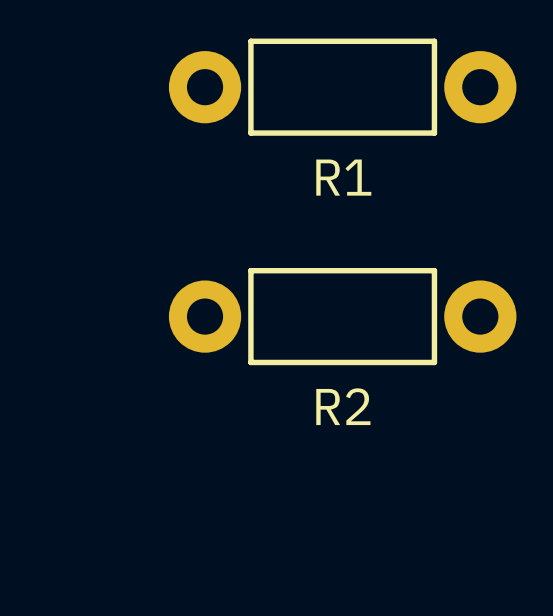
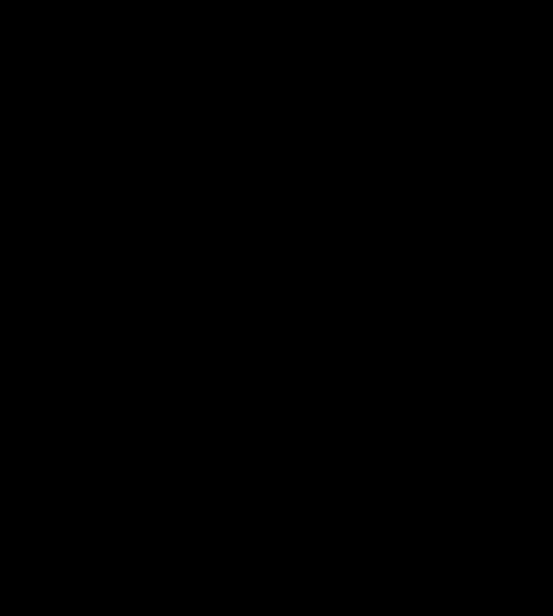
R1: (342, 87) -> none
R2: (342, 316) -> none

